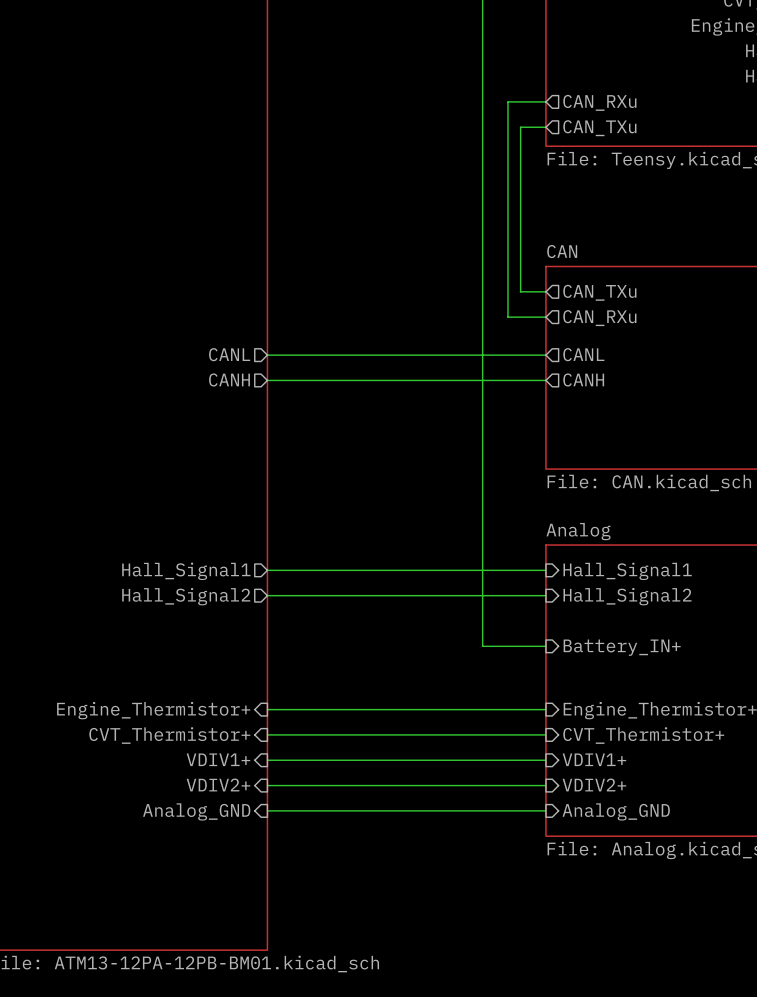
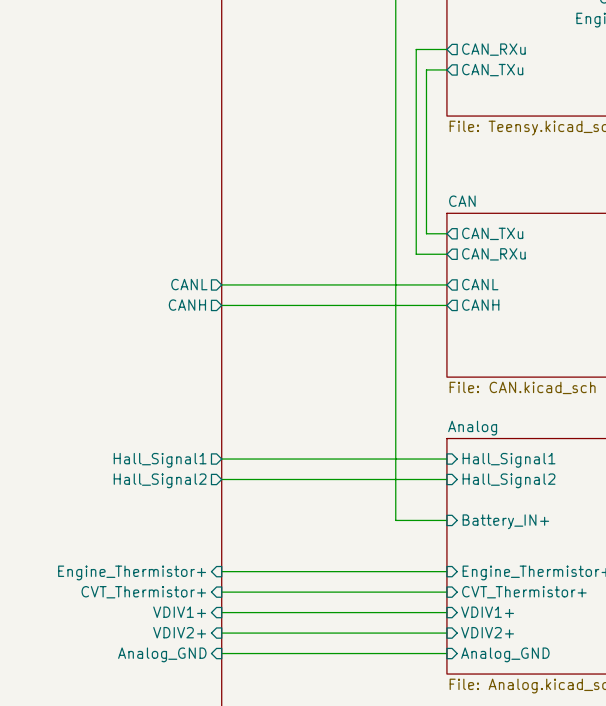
wire: (507, 101) (545, 101) -> (416, 80) (416, 49) (446, 49)
sheet pin position: CAN_RXu (599, 102) -> CAN_RXu (493, 49)
wire: (520, 127) (545, 127) -> (426, 100) (426, 69) (446, 69)
sheet pin position: CAN_TXu (599, 128) -> CAN_TXu (492, 70)

